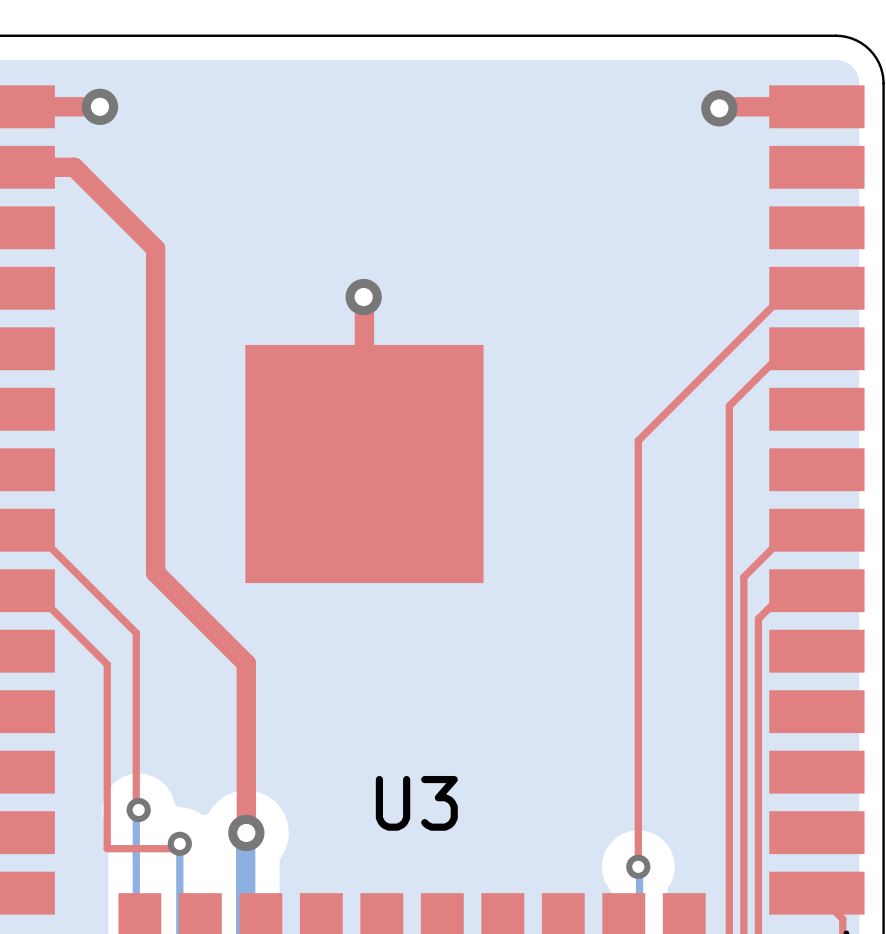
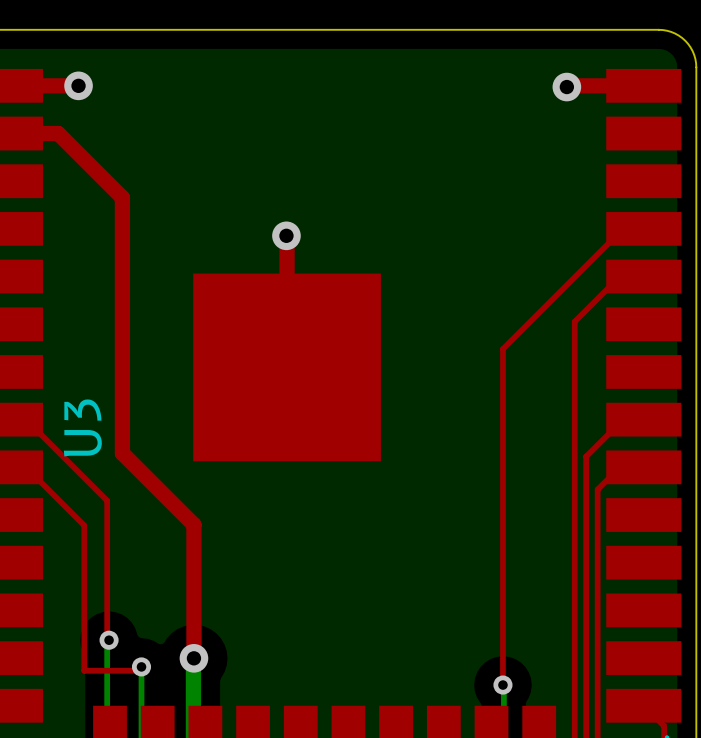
U3 name rotation: 0° (416, 803) -> 90° counterclockwise (82, 427)
U3 name position: U3 (416, 803) -> U3 (82, 427)

